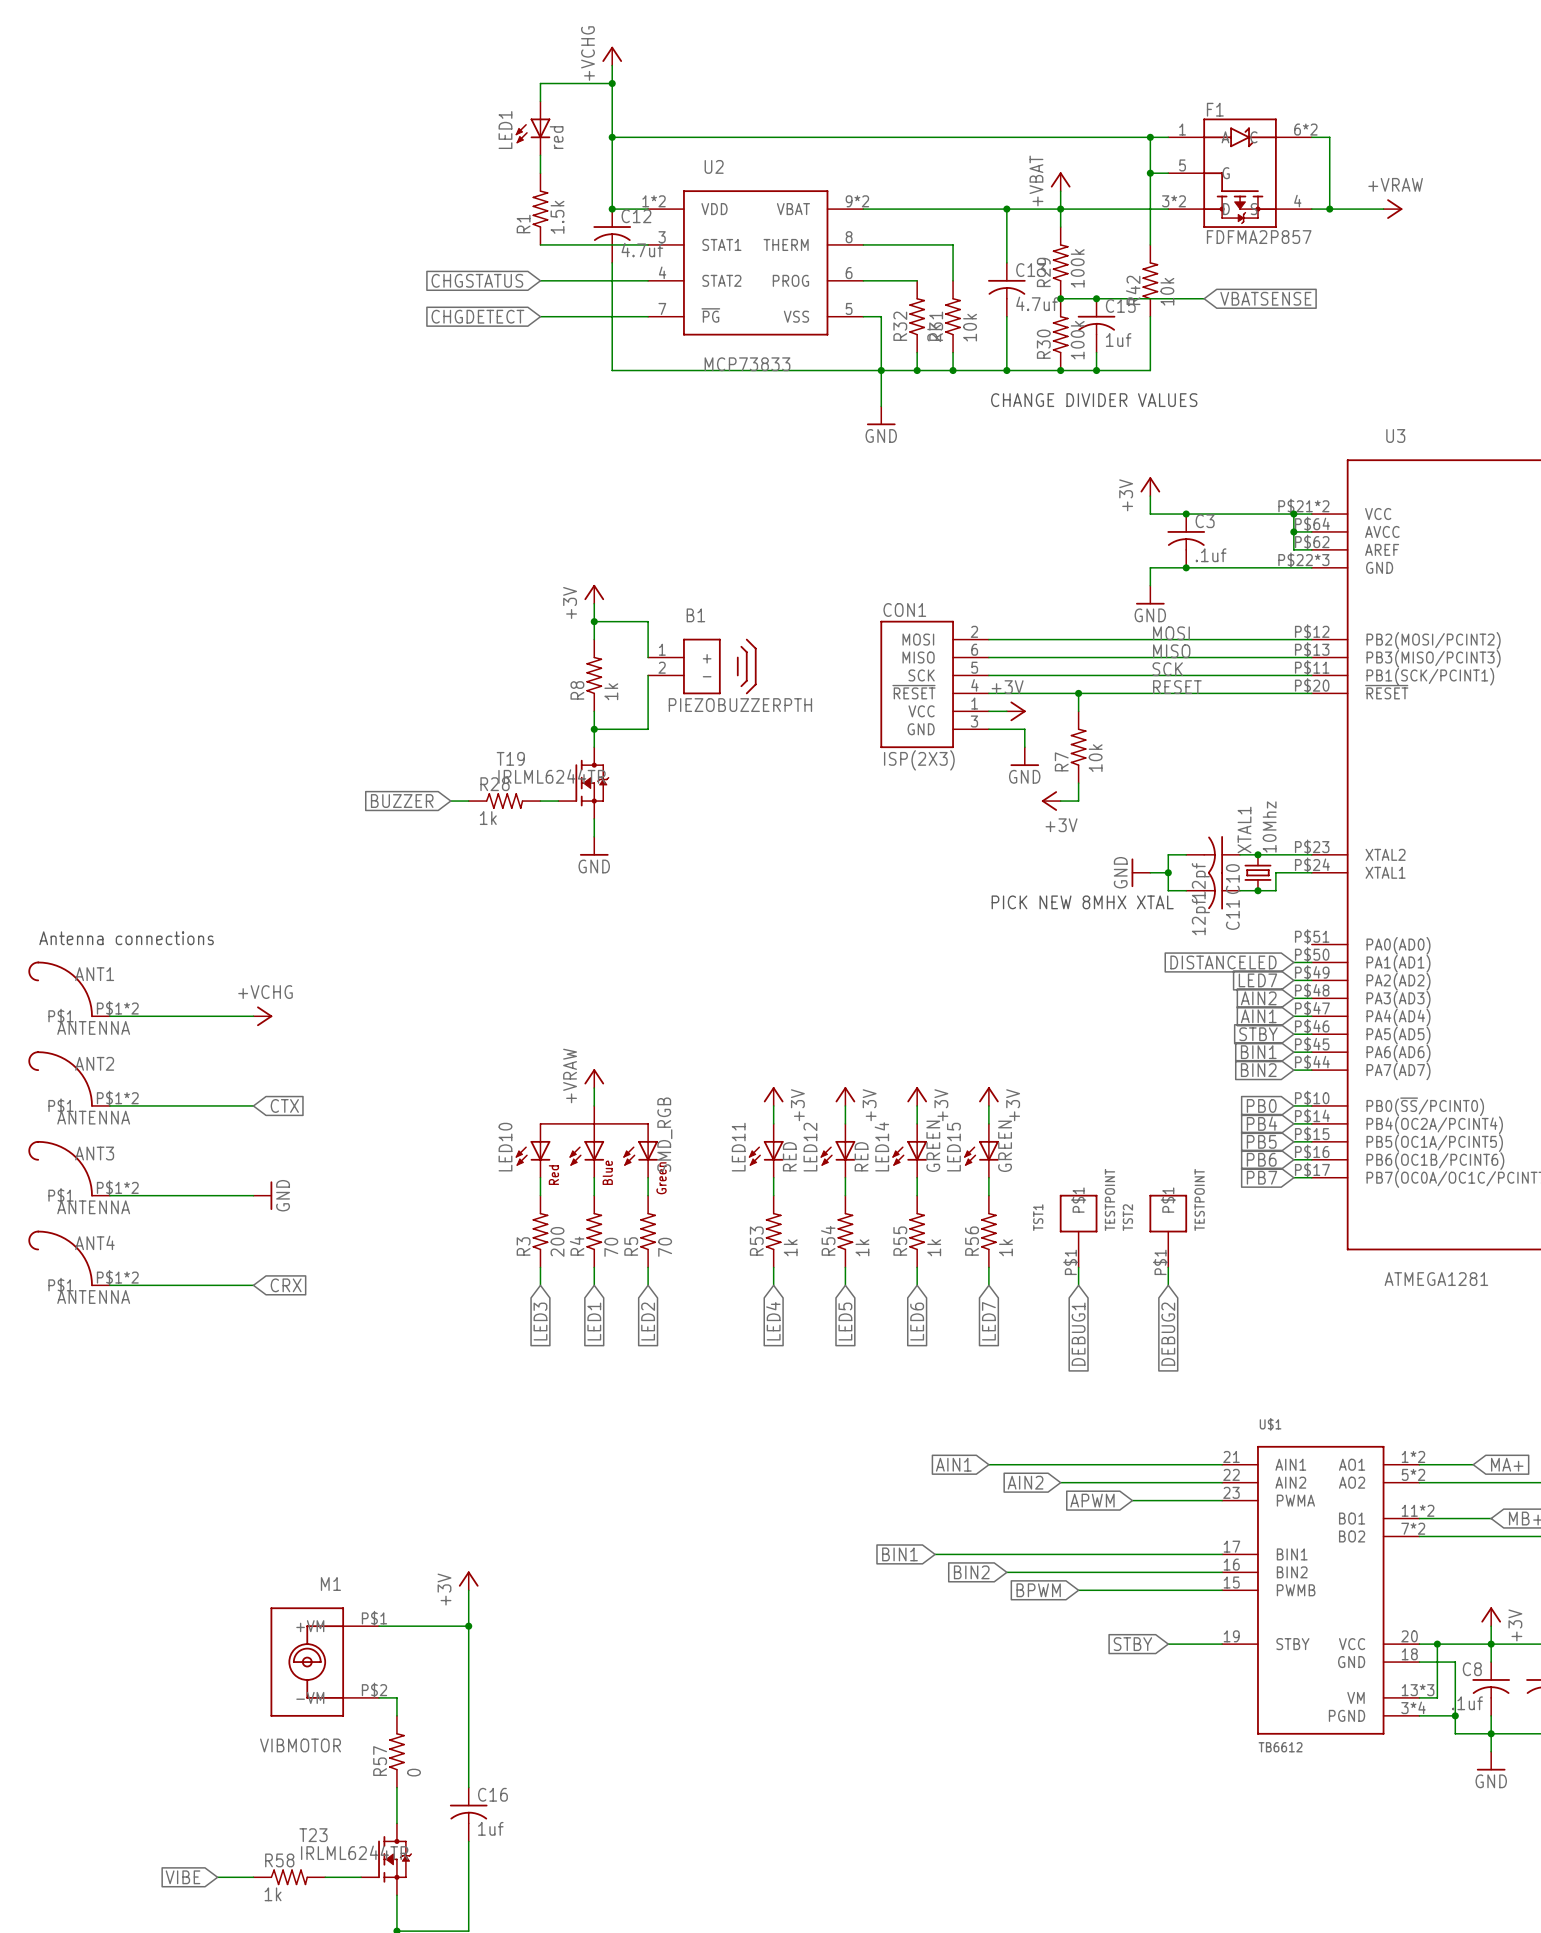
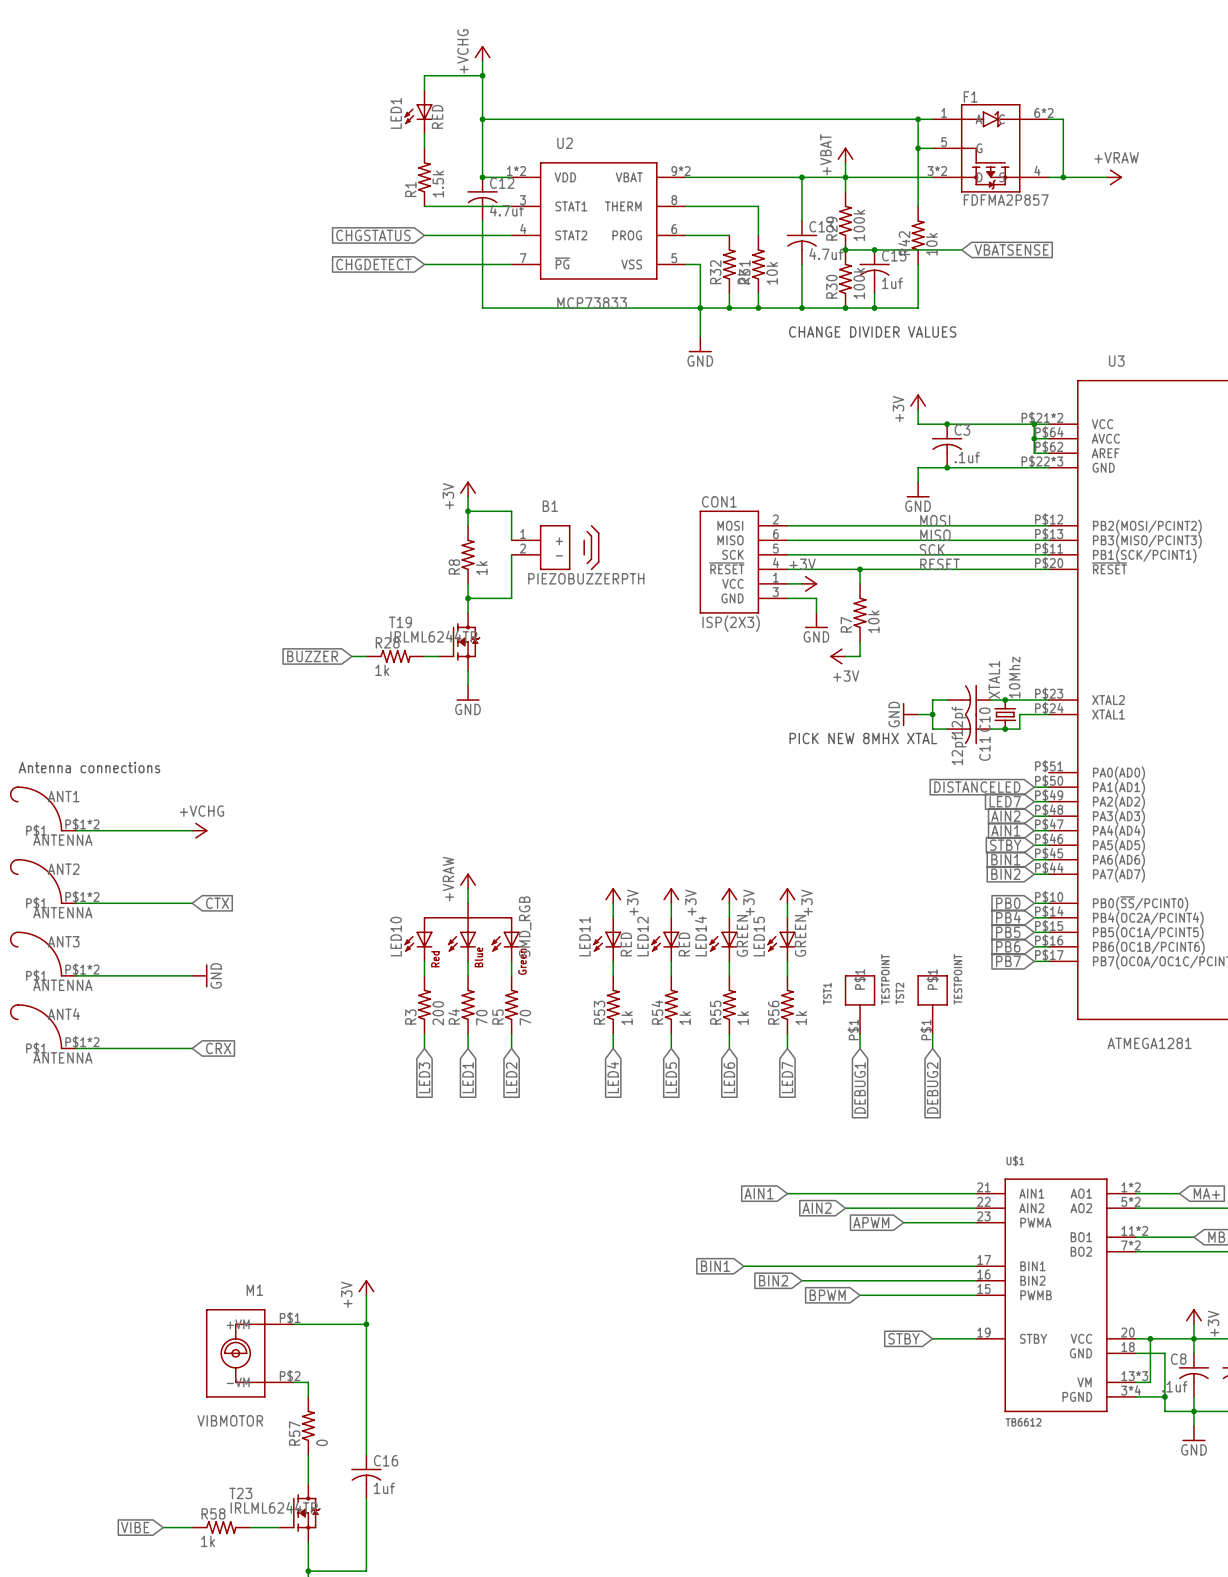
LED1 value: red (556, 137) -> RED (437, 116)

